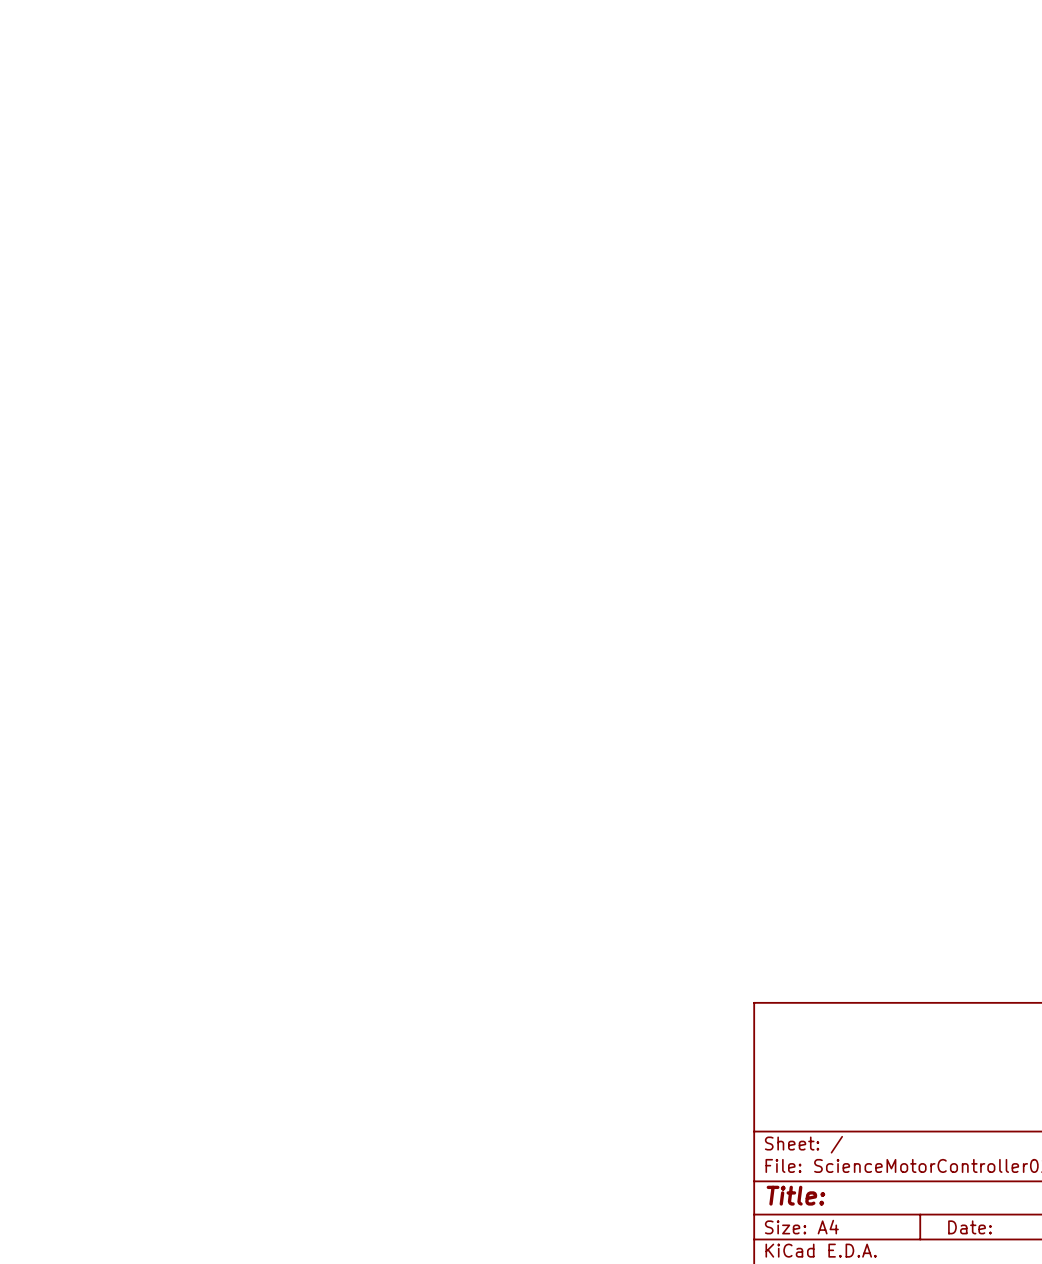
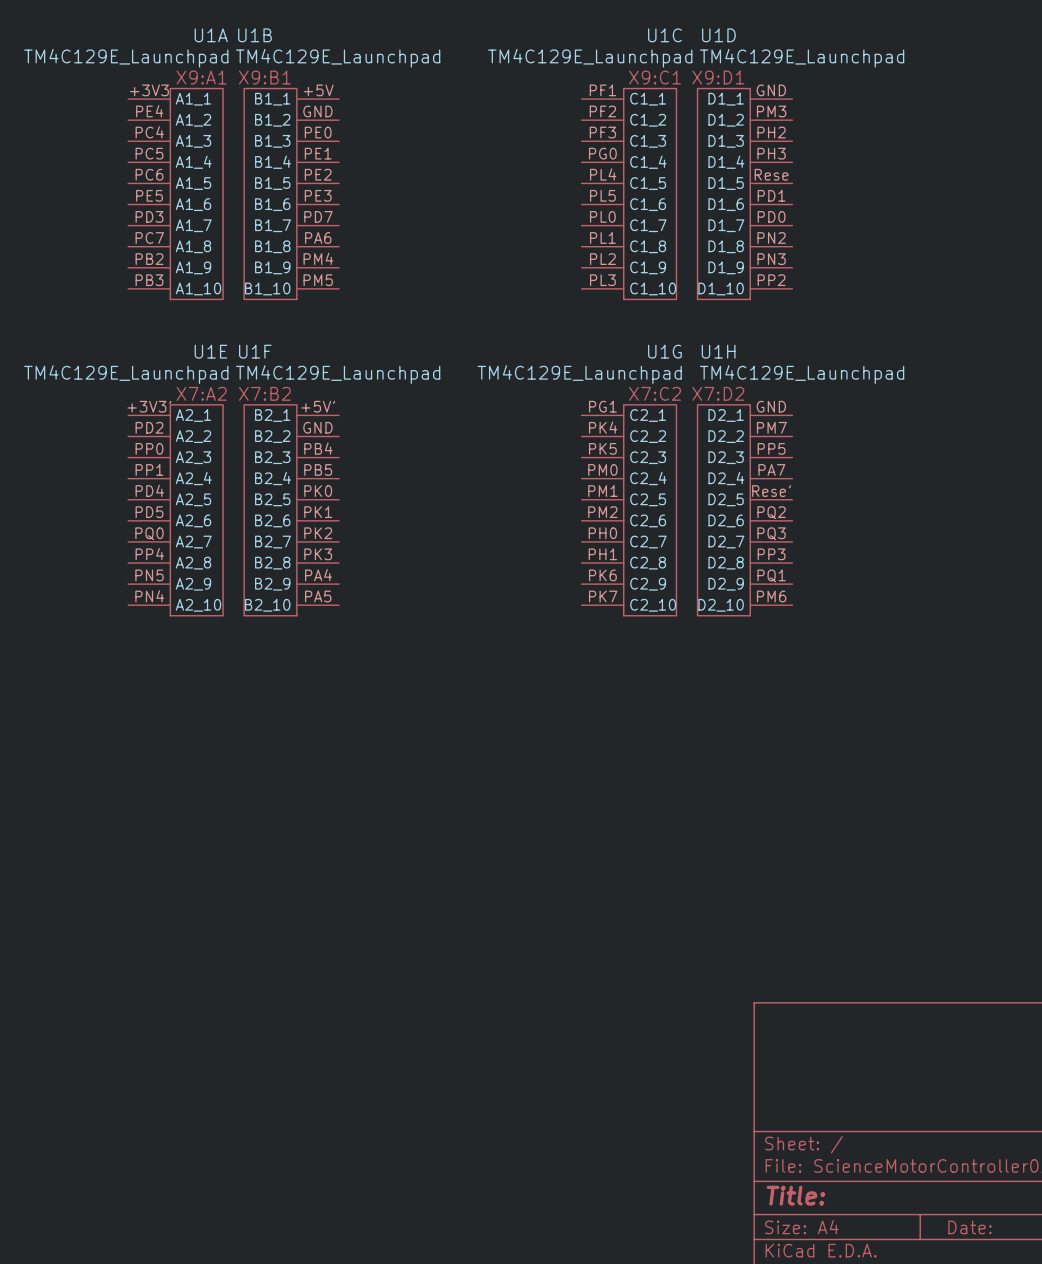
U1A: none -> TM4C129E_Launchpad (175, 193)
U1B: none -> TM4C129E_Launchpad (291, 193)
U1C: none -> TM4C129E_Launchpad (629, 193)
U1D: none -> TM4C129E_Launchpad (744, 193)
U1E: none -> TM4C129E_Launchpad (175, 510)
U1F: none -> TM4C129E_Launchpad (291, 510)
U1G: none -> TM4C129E_Launchpad (629, 510)
U1H: none -> TM4C129E_Launchpad (744, 510)

